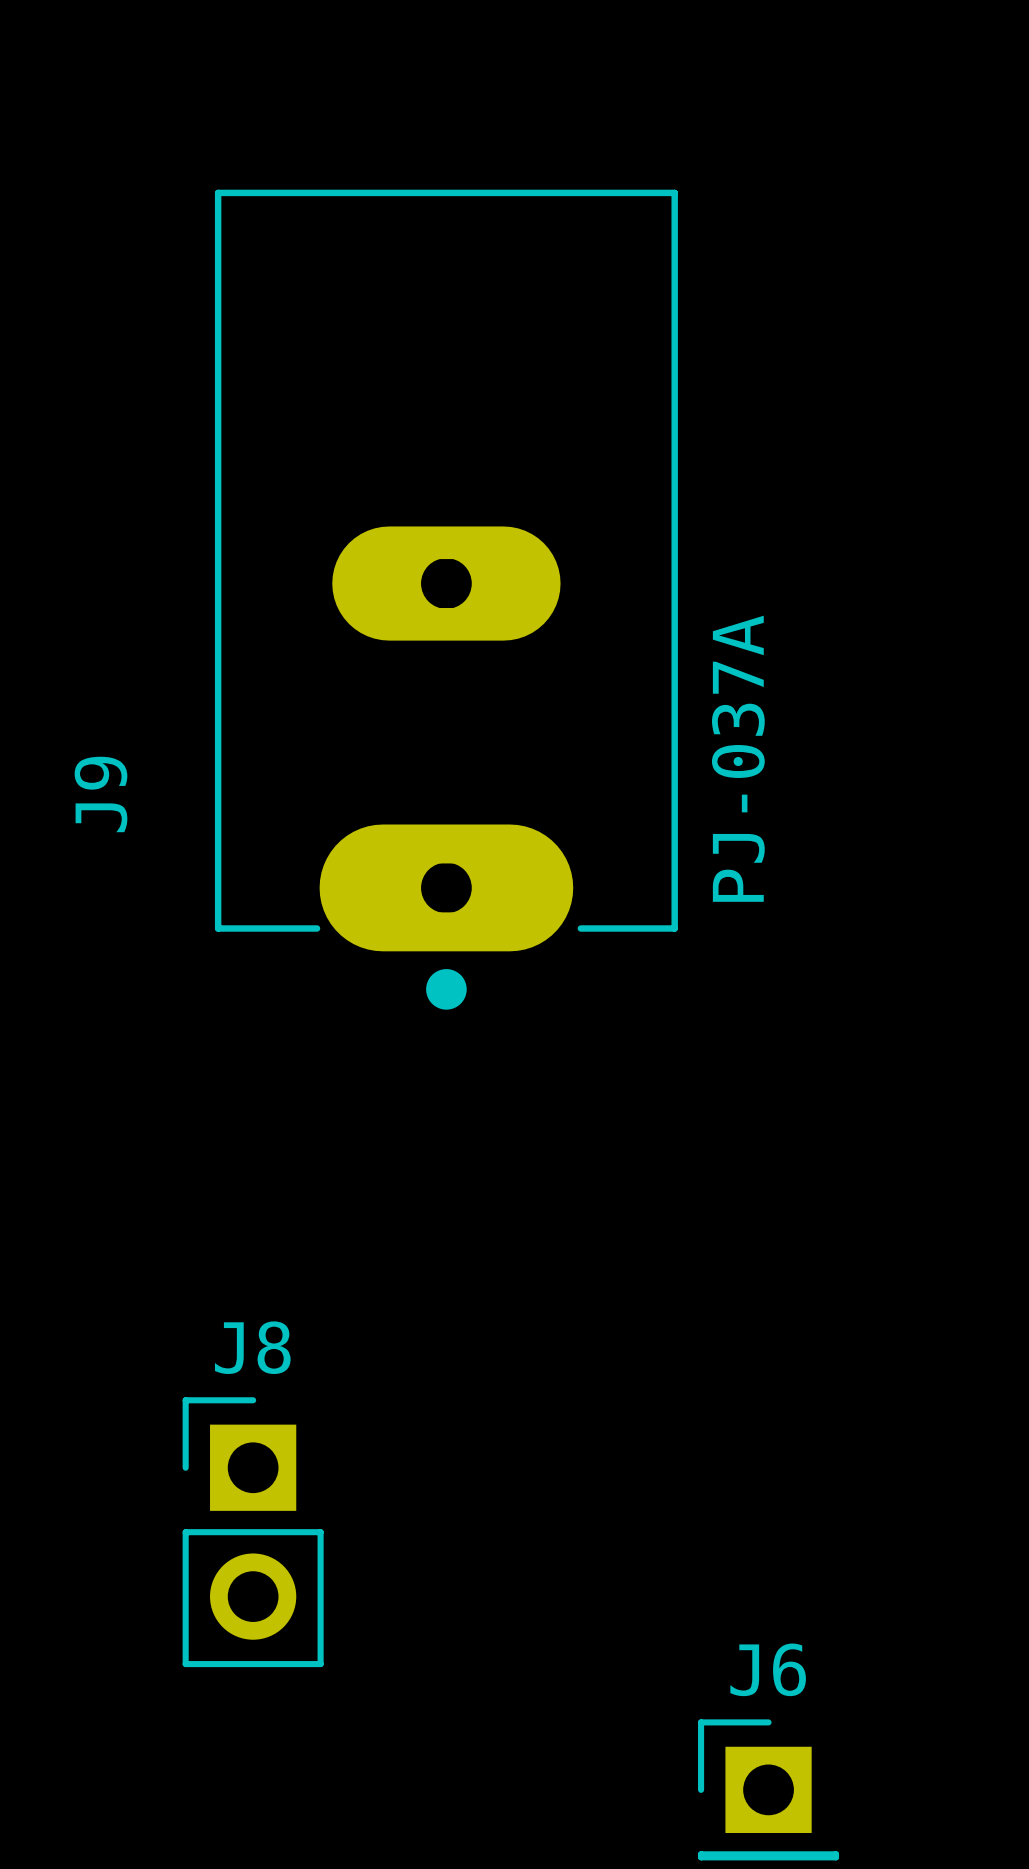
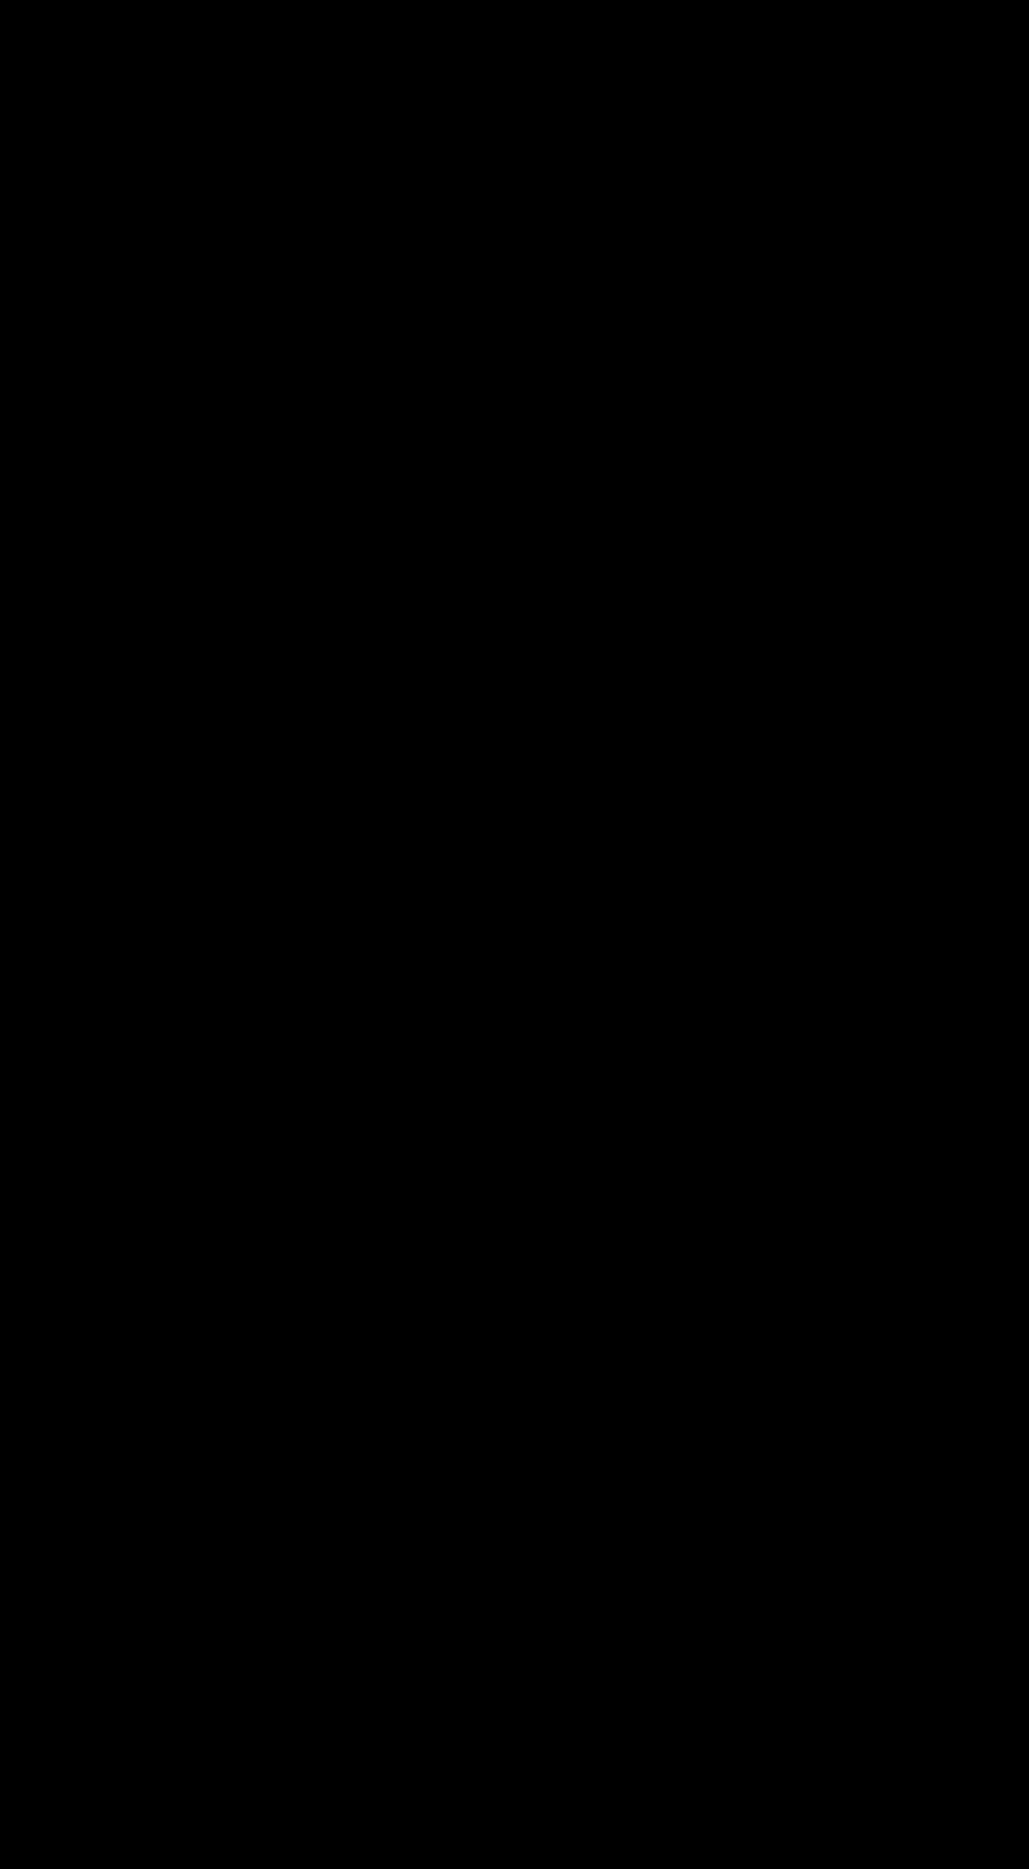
J9: PJ-037A (446, 599) -> none
J8: (253, 1532) -> none
J6: (768, 1789) -> none

